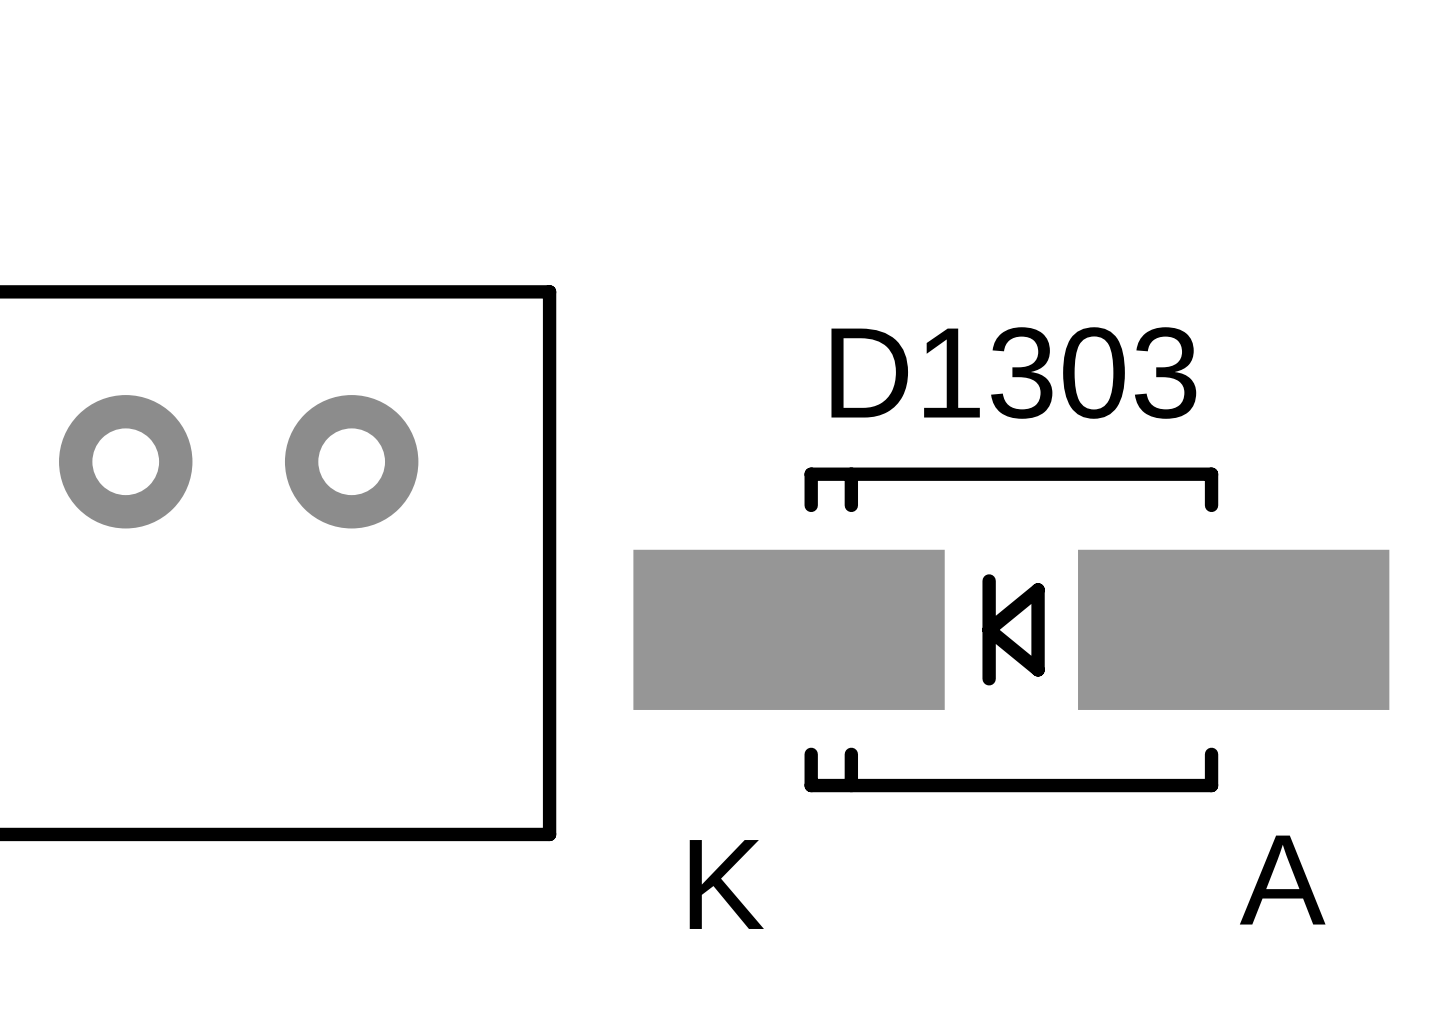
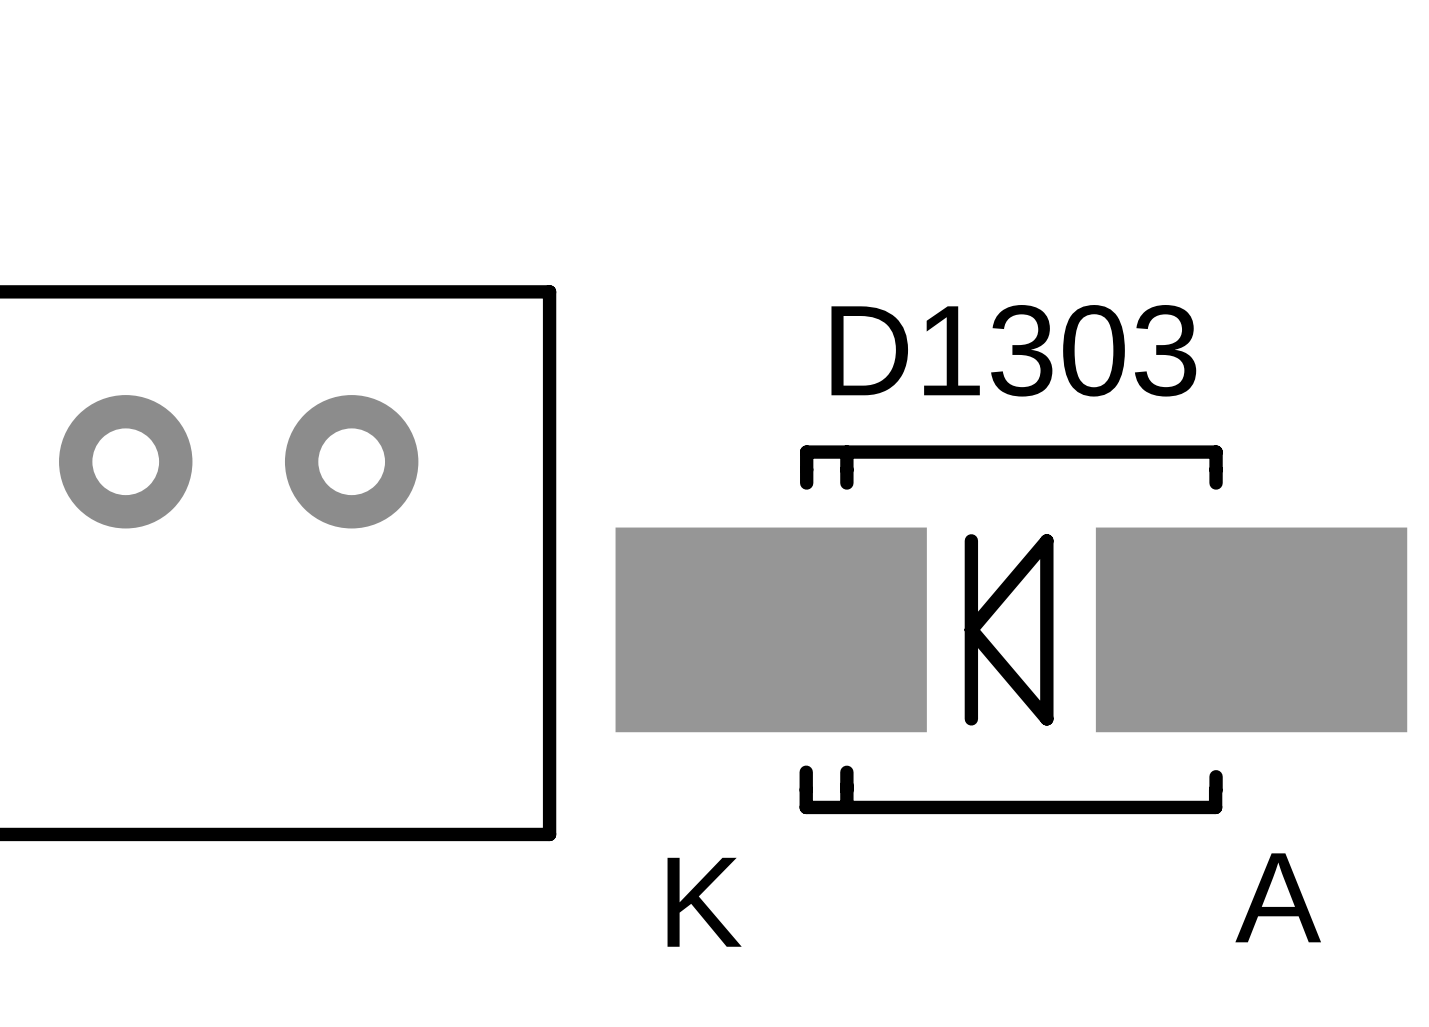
D1303 footprint: [633, 467, 1390, 793] -> [615, 445, 1408, 815]

